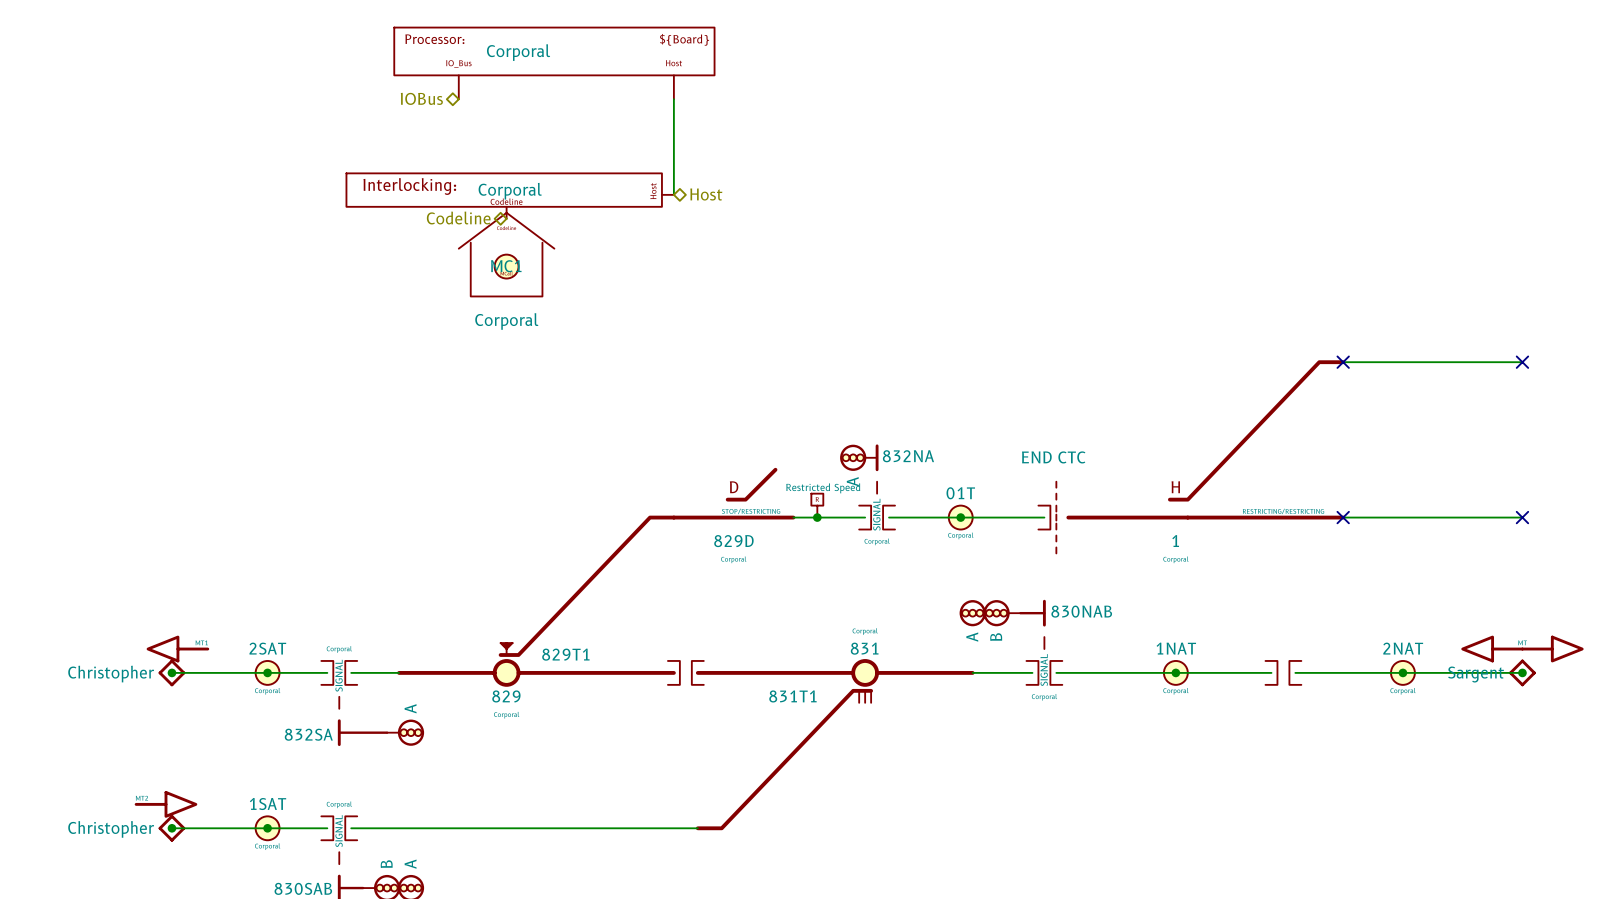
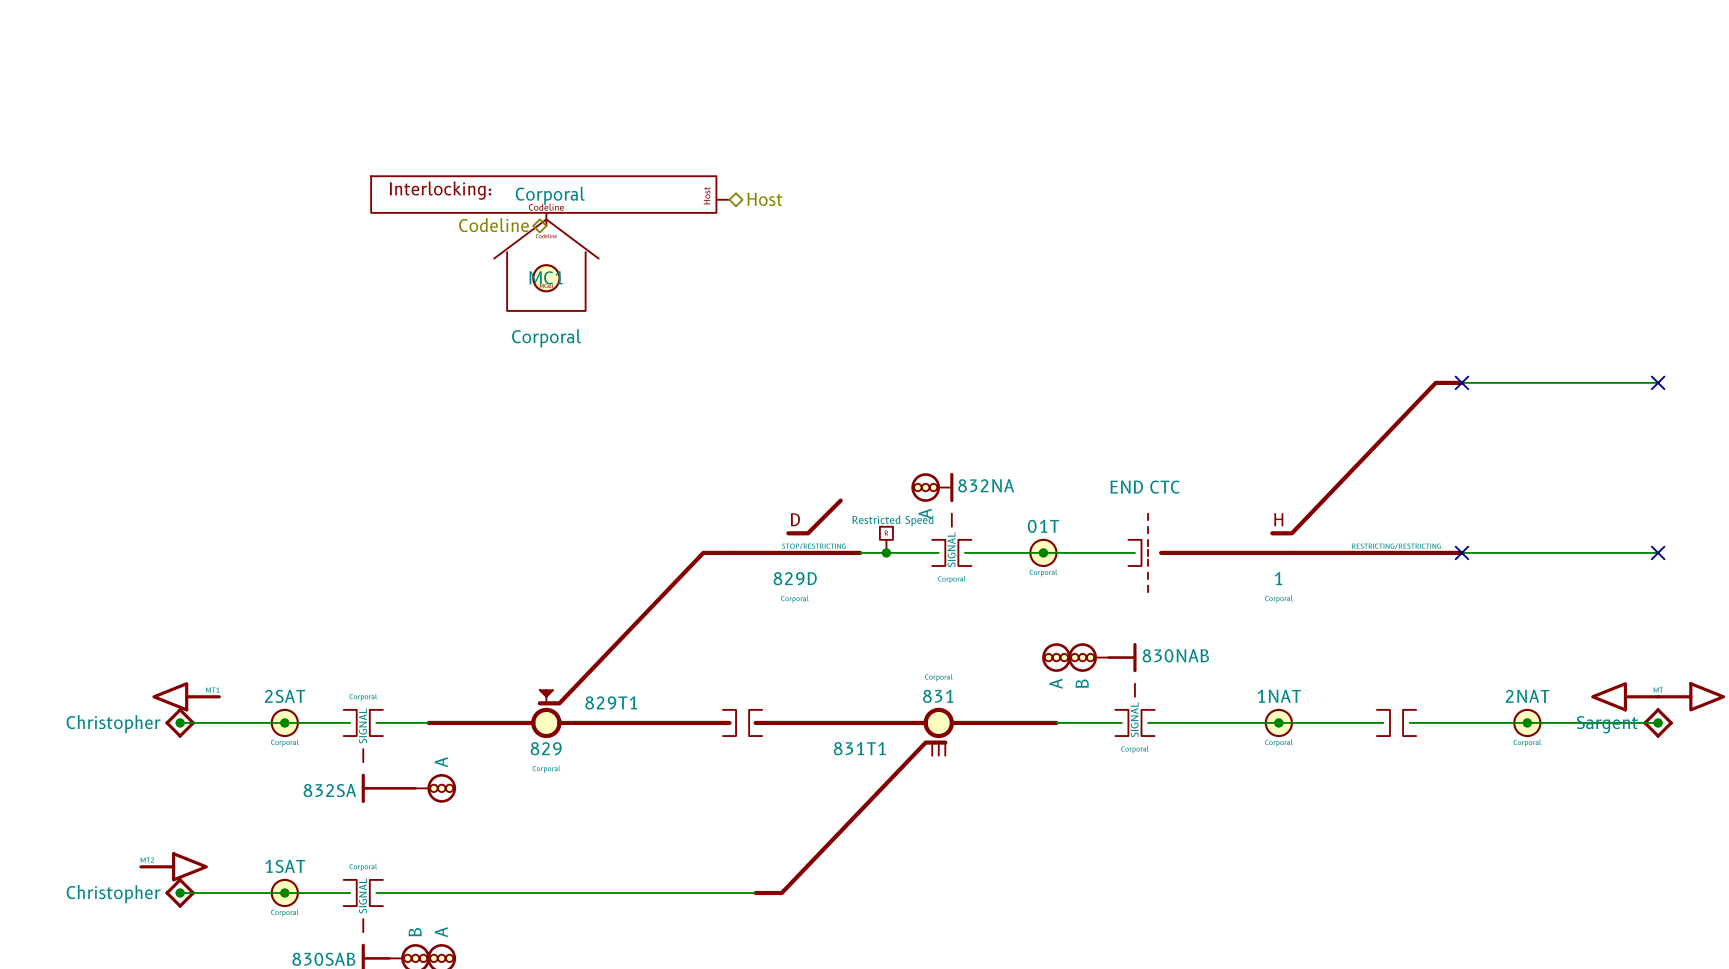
part: Corporal (554, 63) -> none
hierarchical label: IOBus (421, 98) -> none
wire: (673, 99) (673, 194) -> none

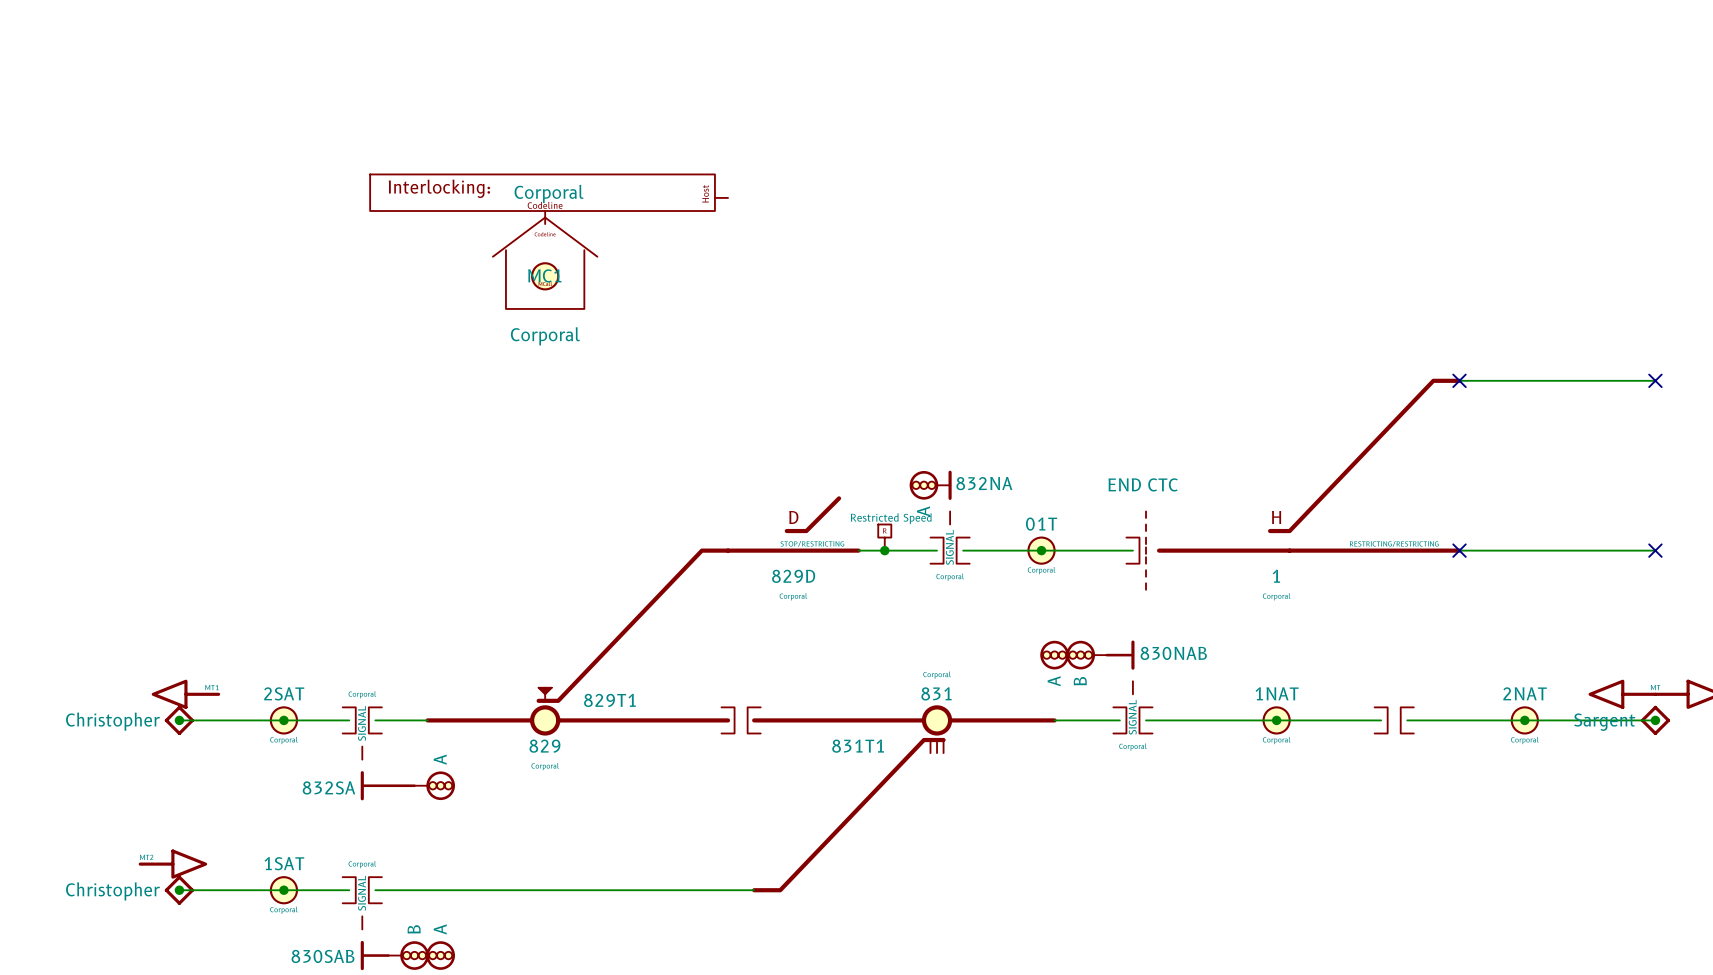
hierarchical label: Host (764, 199) -> none
hierarchical label: Codeline (493, 225) -> none

